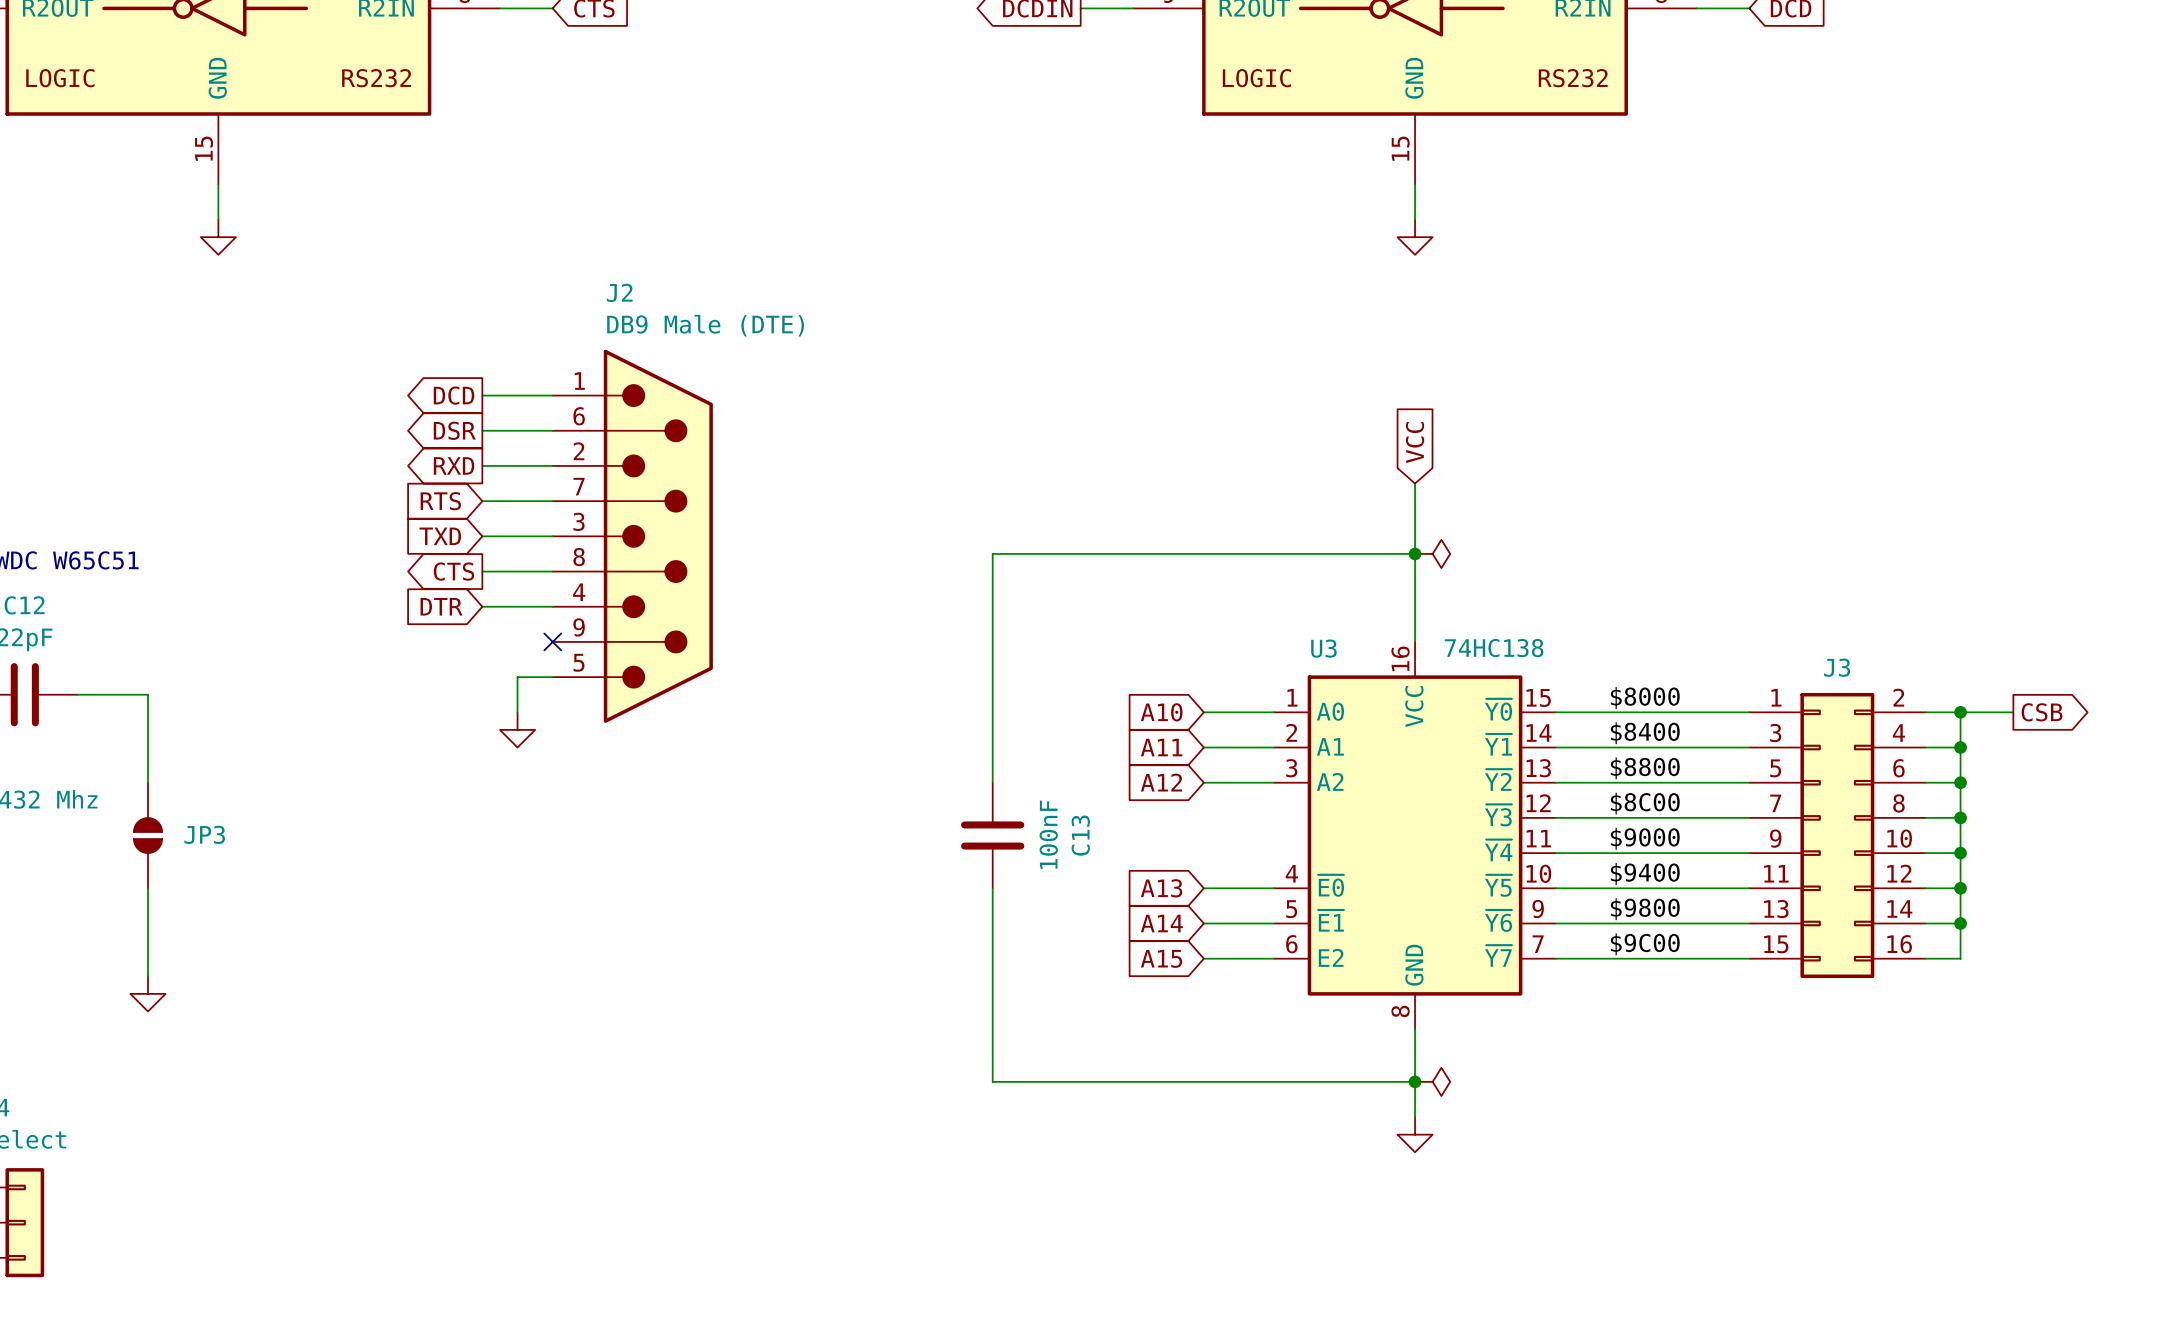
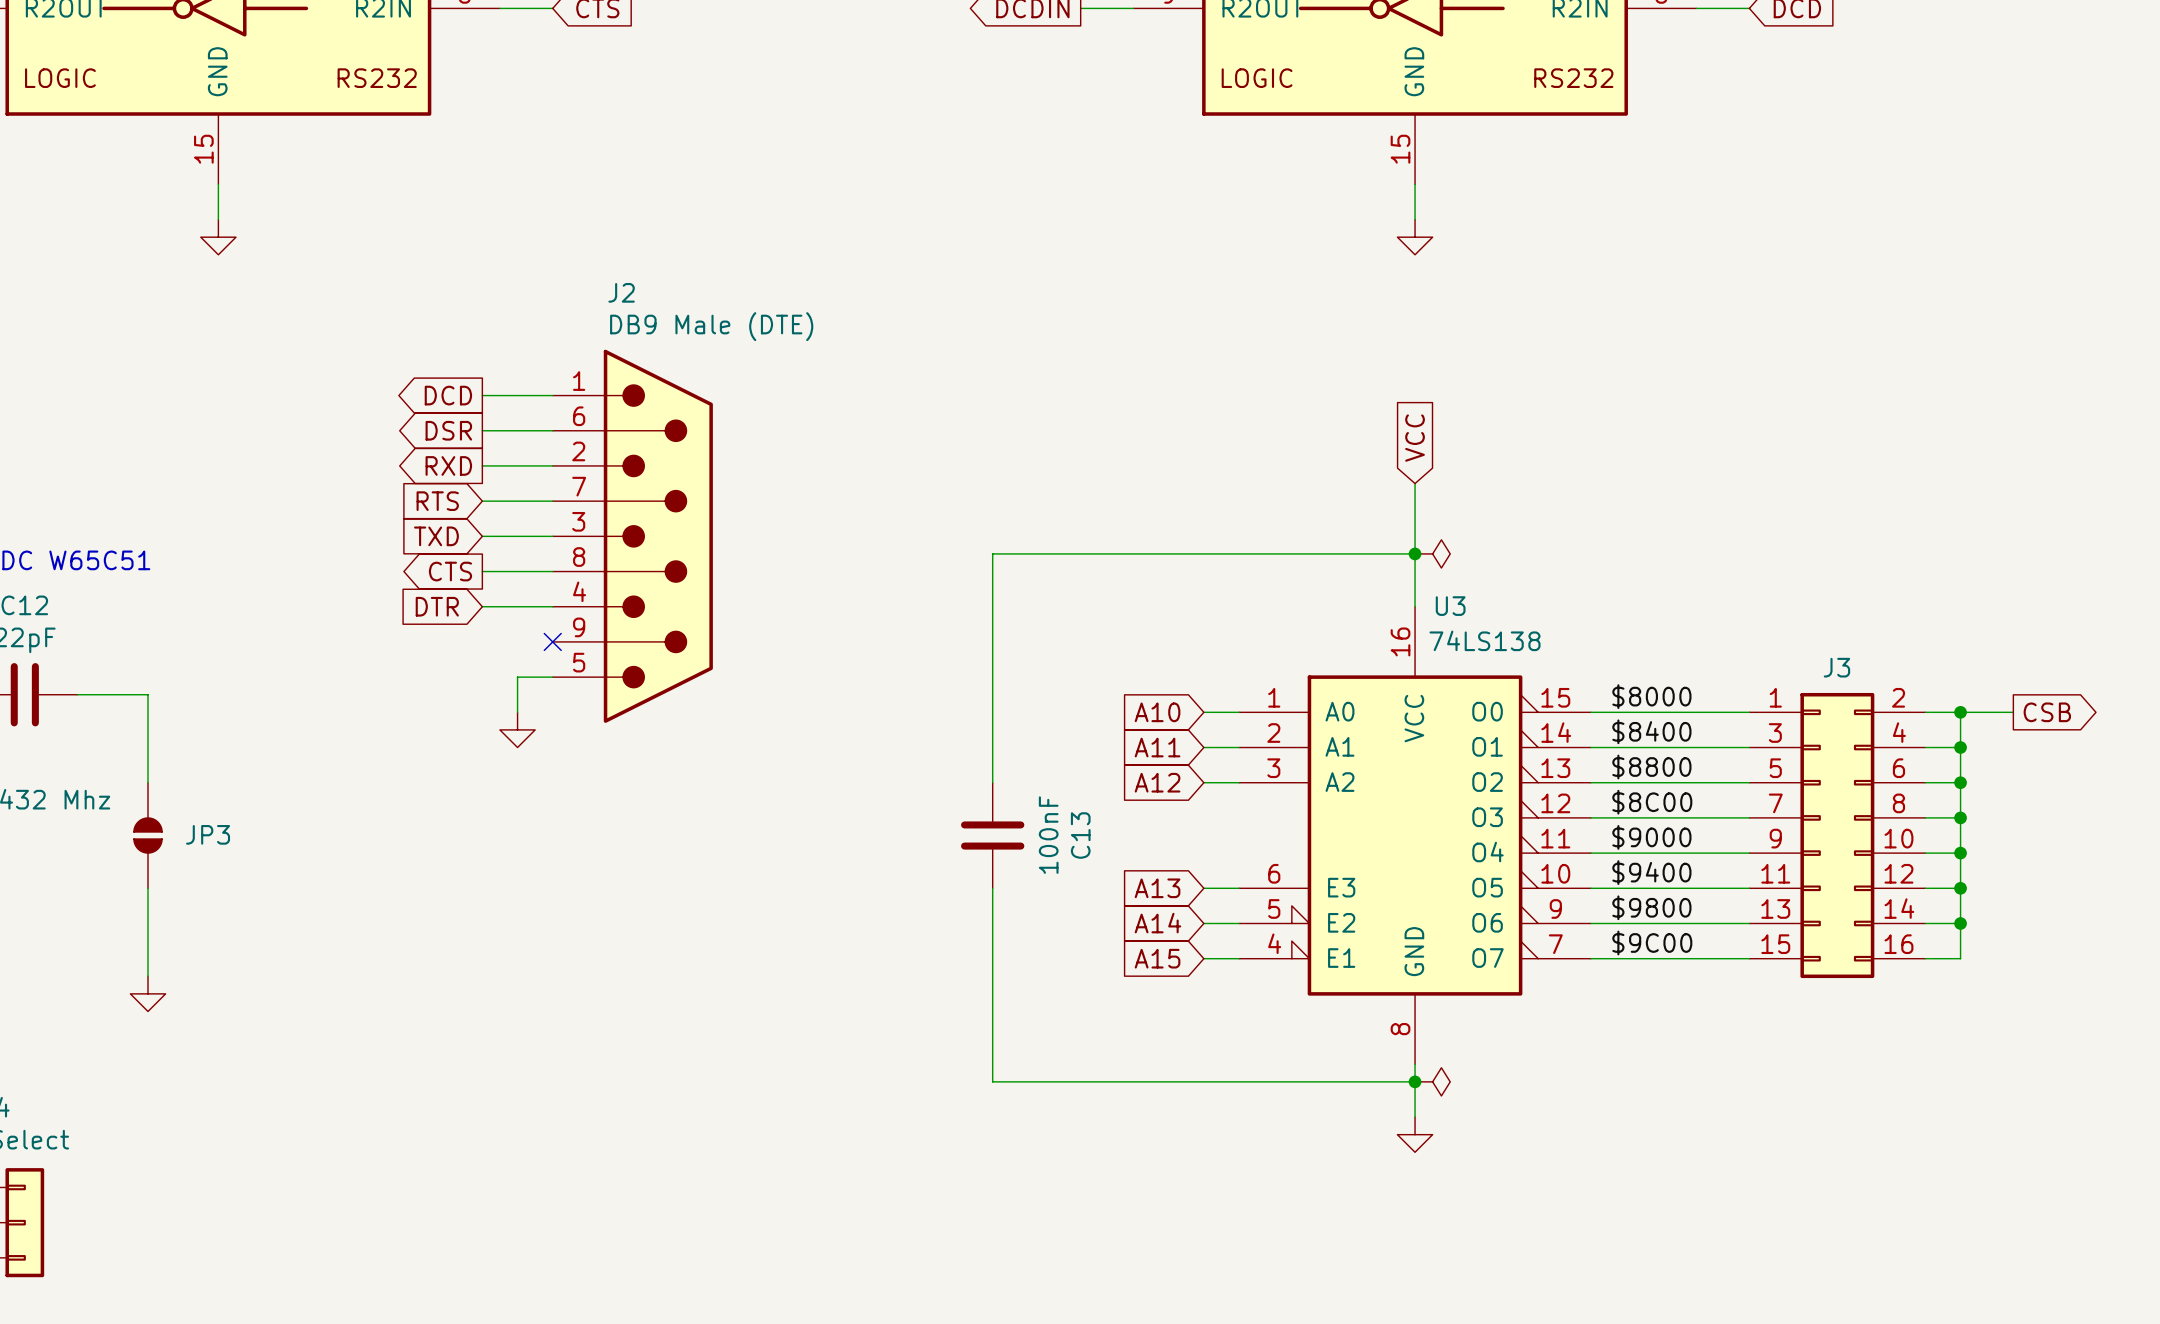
U3 symbol: [1274, 641, 1556, 1030] -> [1239, 606, 1592, 1065]
U3 name position: U3 (1323, 648) -> U3 (1450, 606)
U3 value: 74HC138 (1494, 648) -> 74LS138 (1485, 640)

